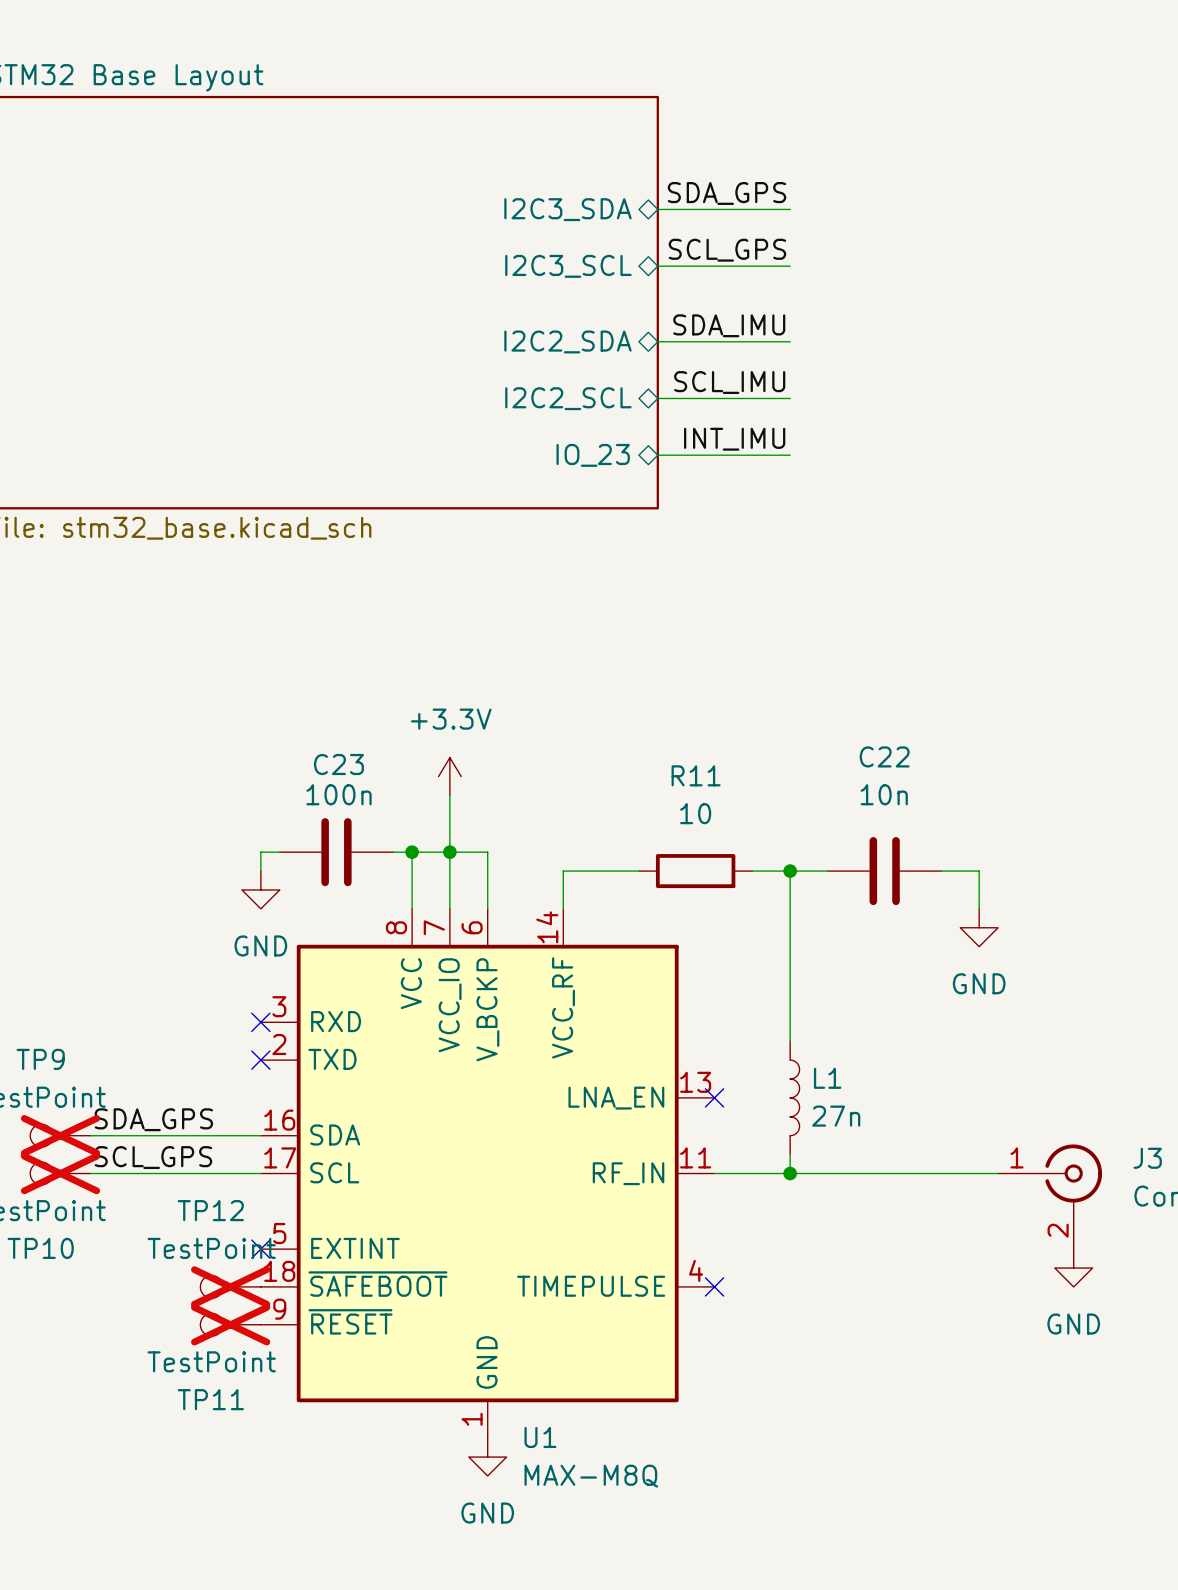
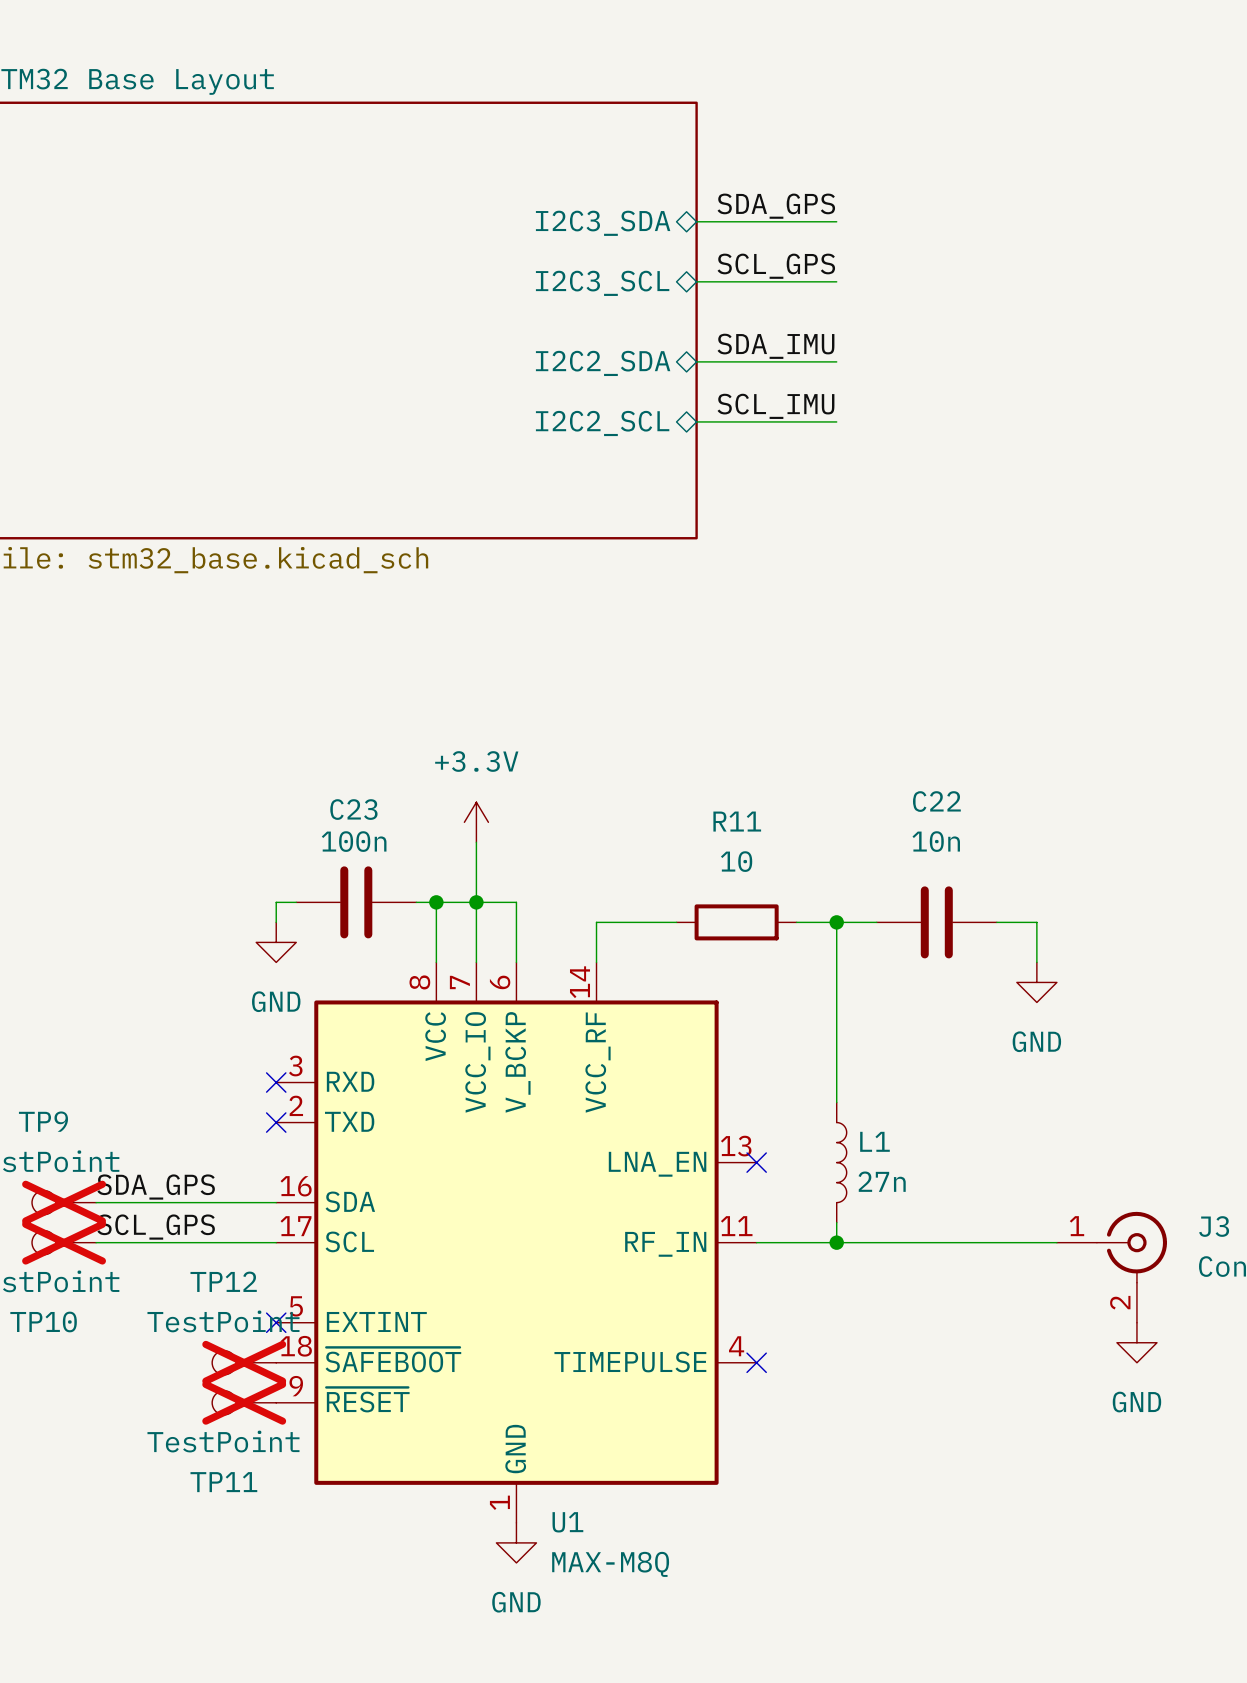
label: INT_IMU (734, 439) -> none
sheet pin: IO_23 (593, 455) -> none
wire: (657, 455) (790, 455) -> none

